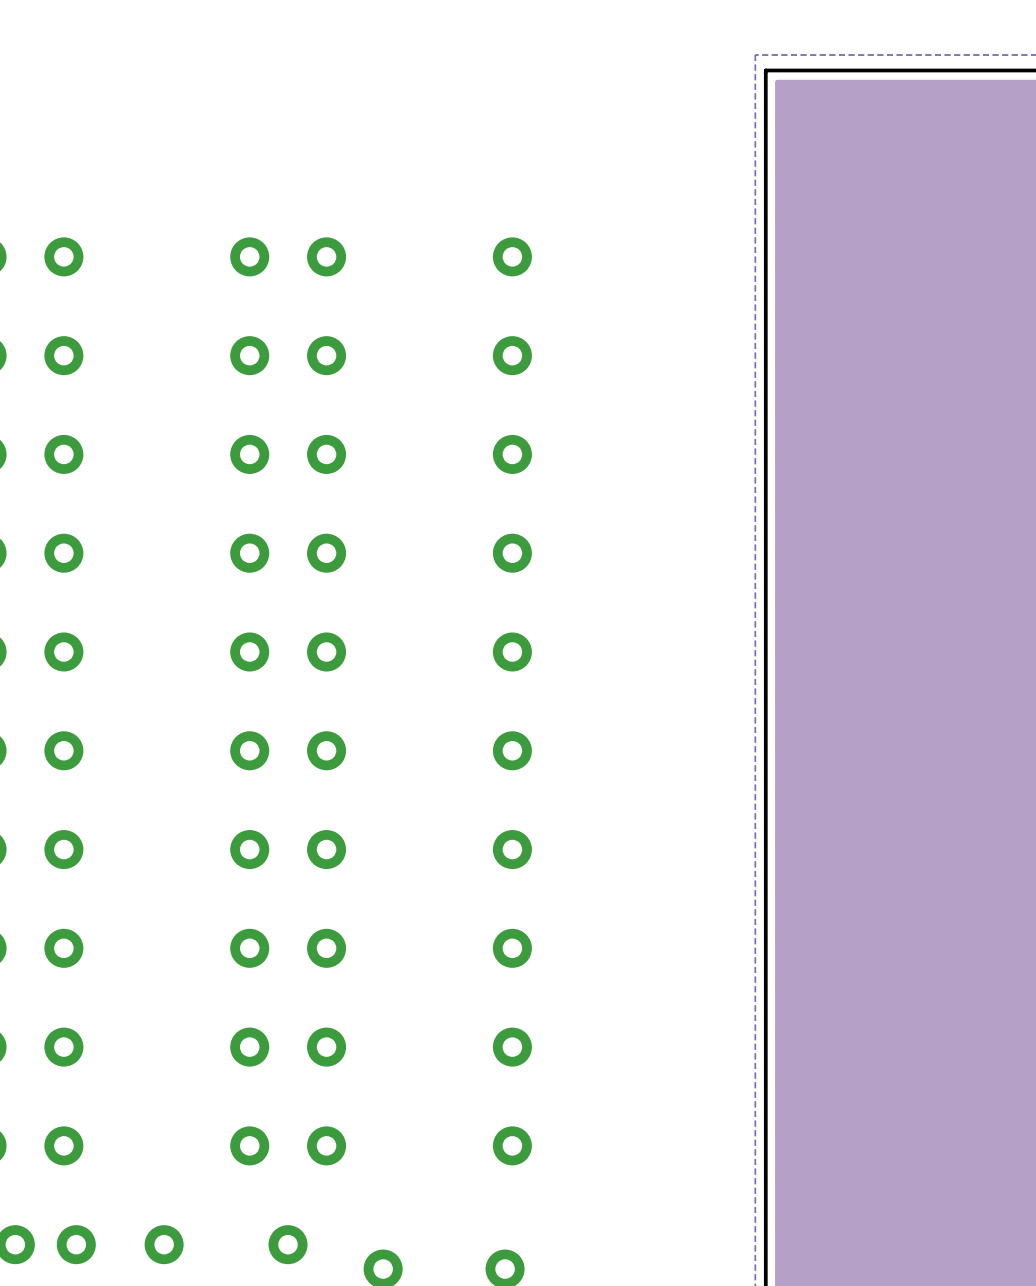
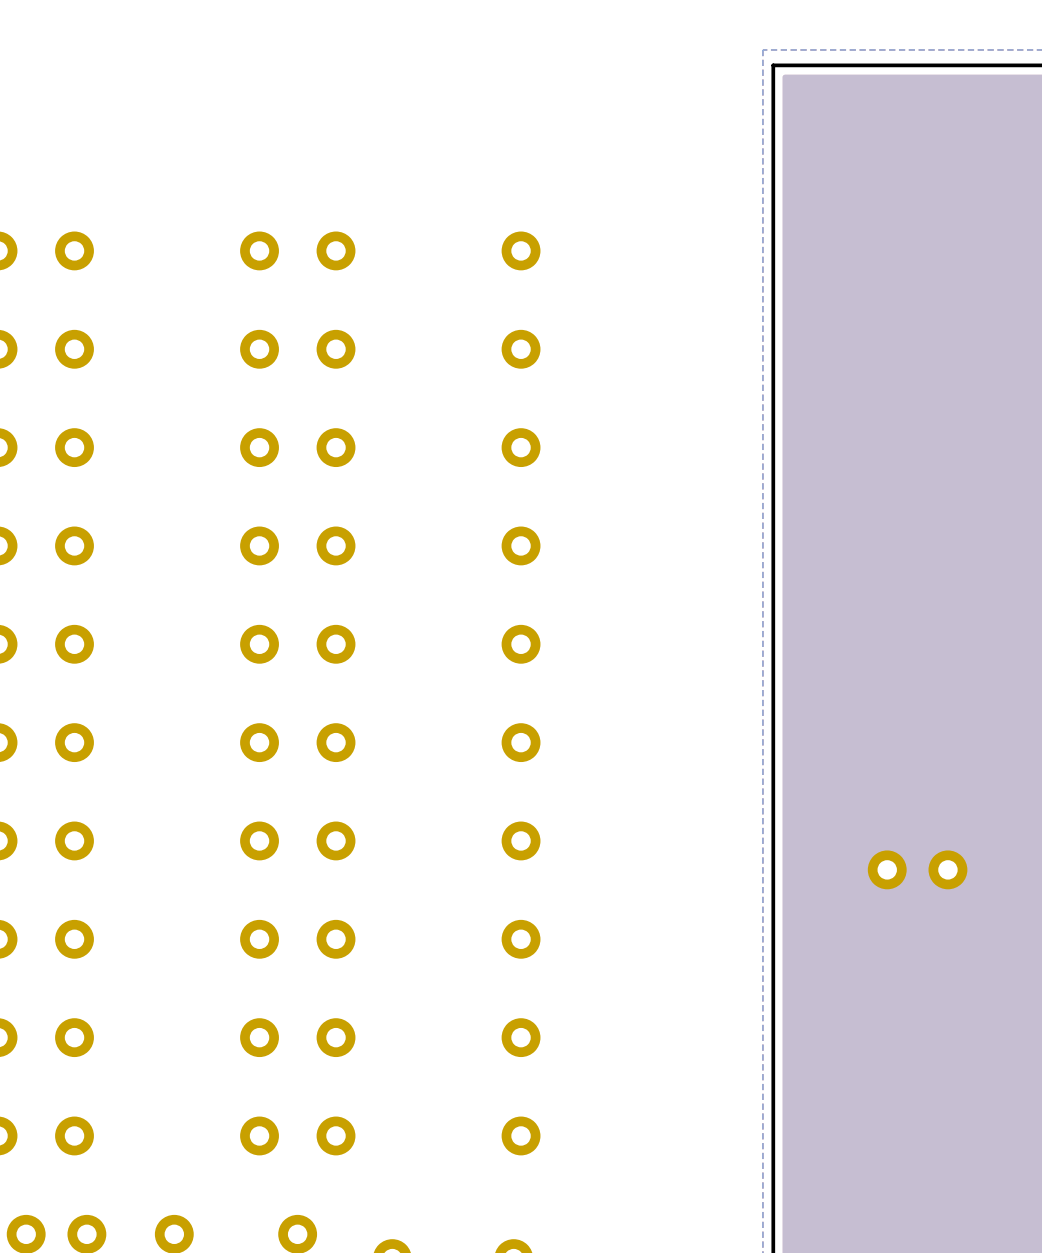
part: none -> (917, 869)

